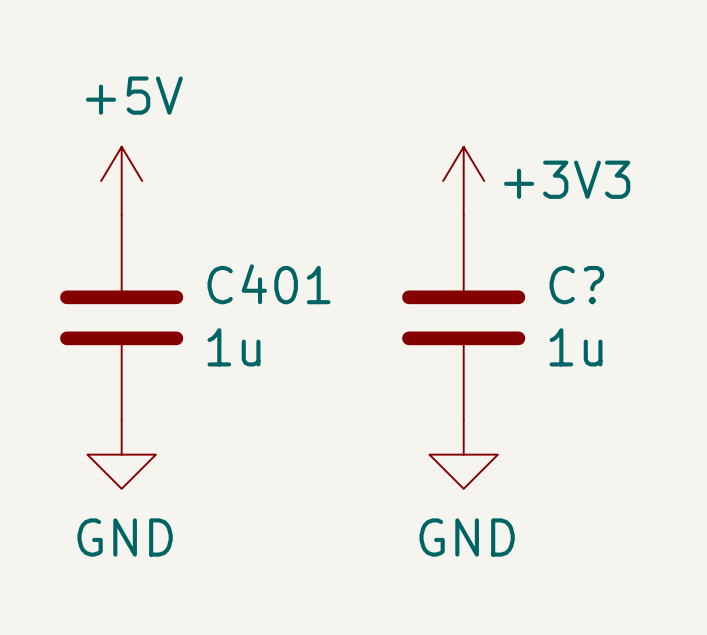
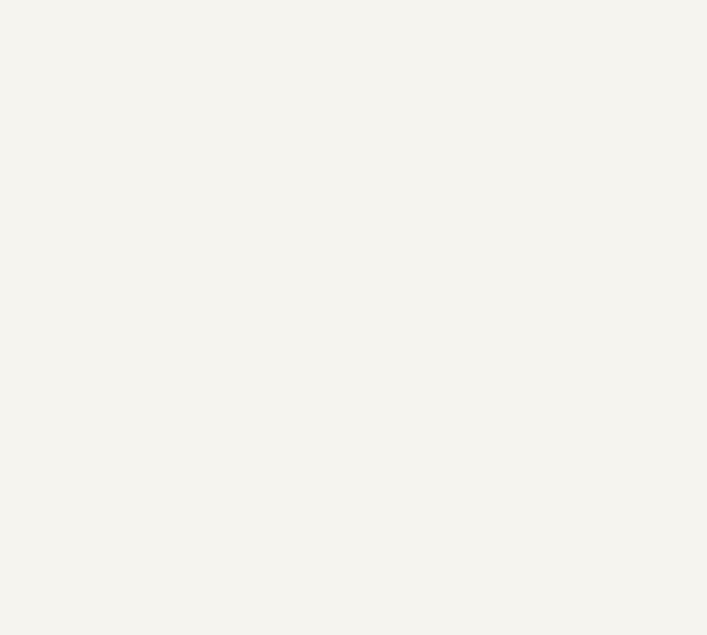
power symbol: +5V (121, 181) -> none
power symbol: +3V3 (463, 181) -> none
C401: 1u (121, 317) -> none
C?: 1u (463, 317) -> none
power symbol: GND (121, 454) -> none
power symbol: GND (463, 454) -> none

